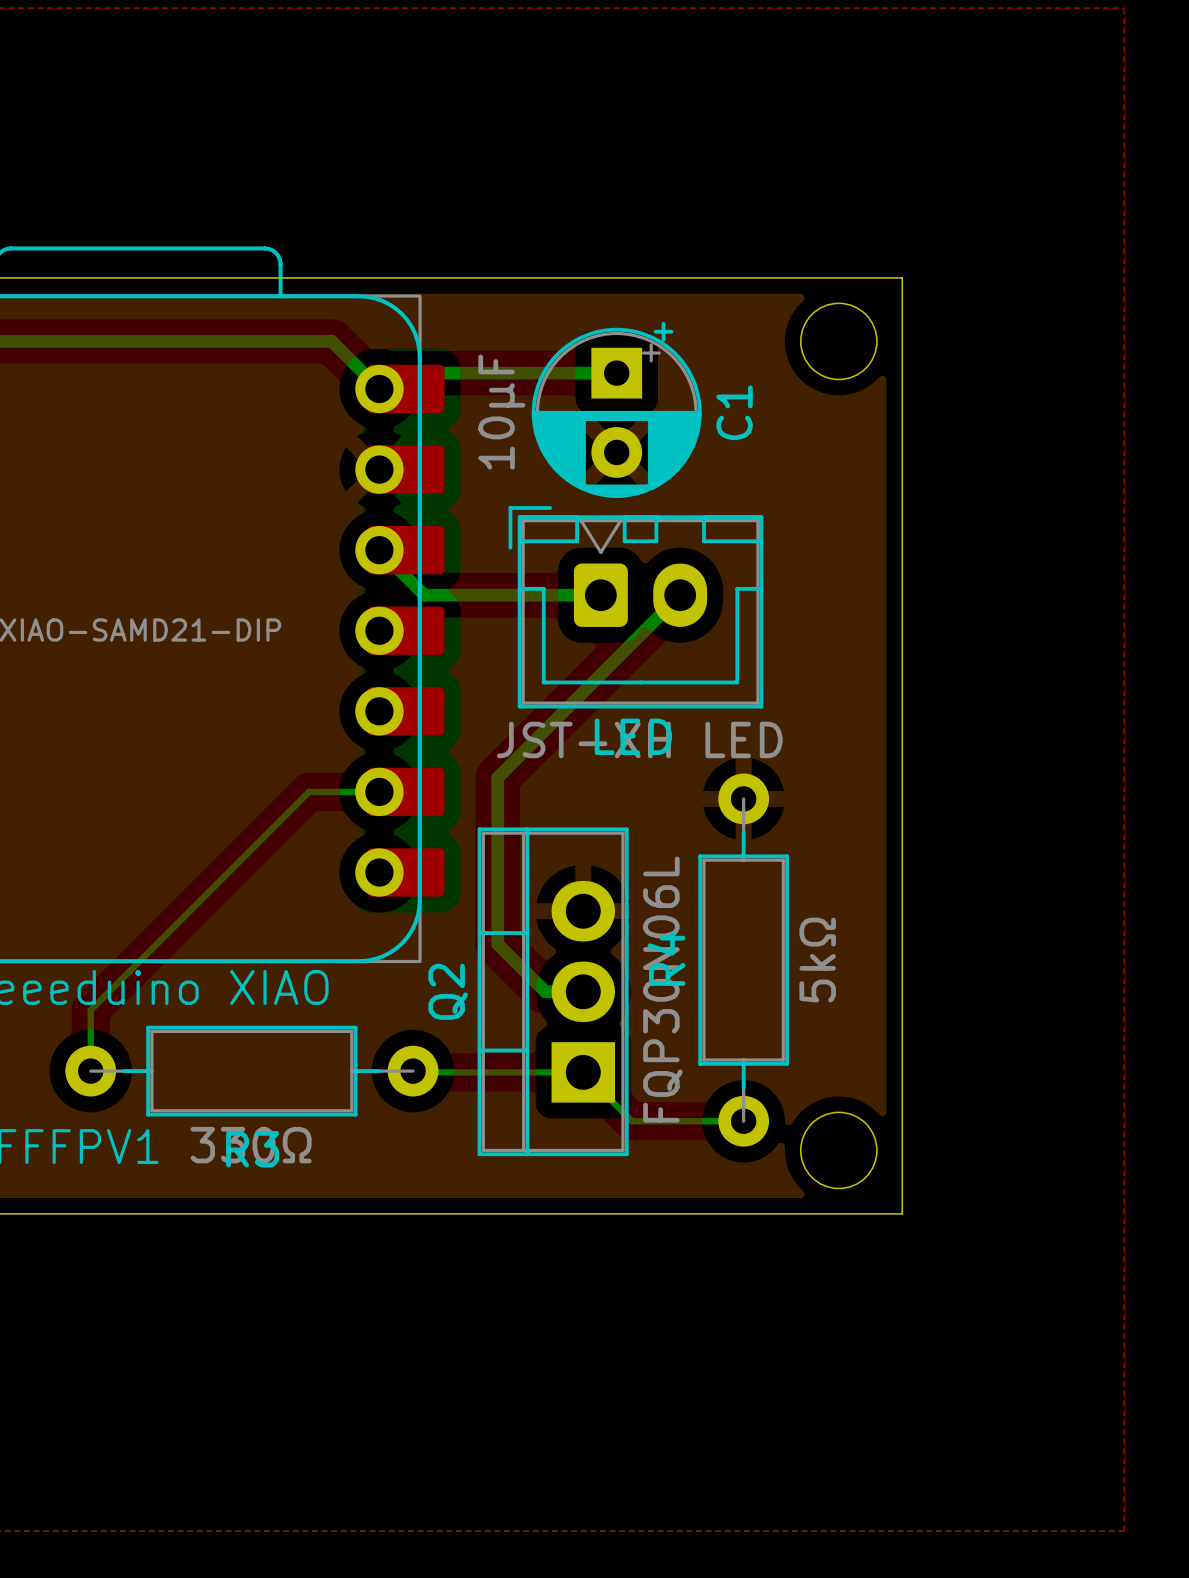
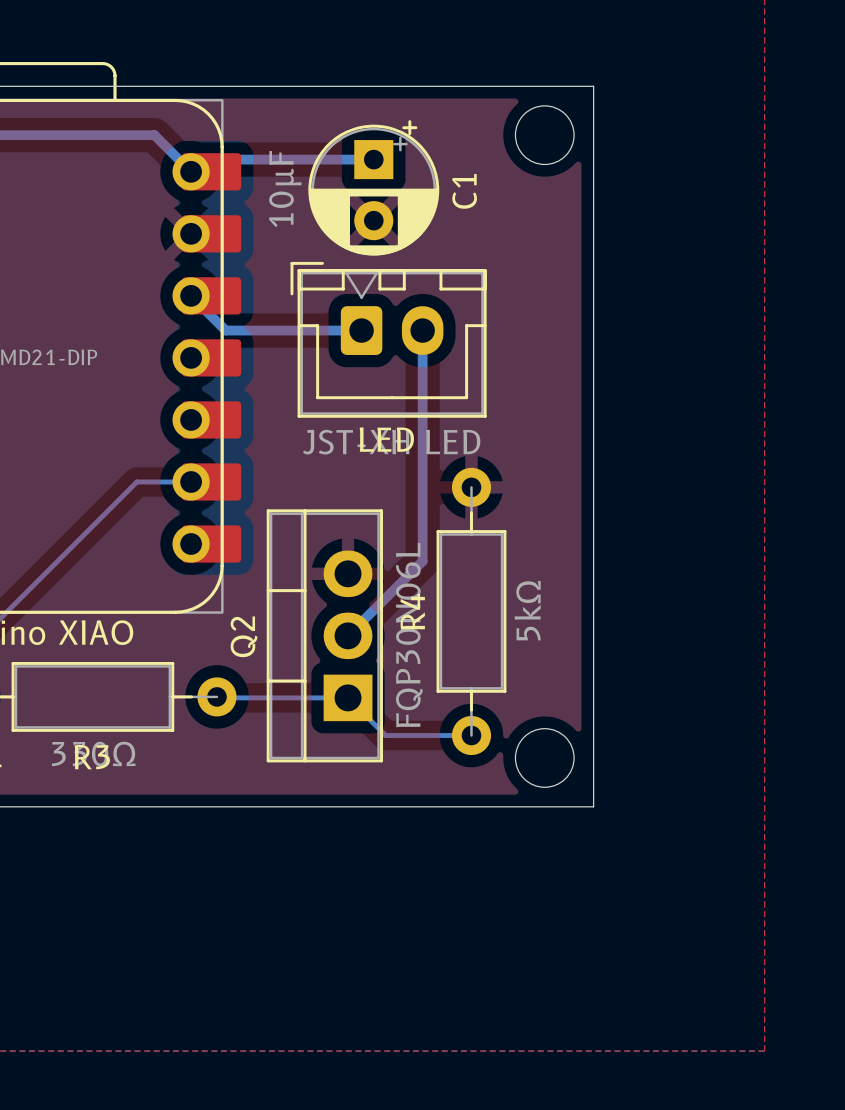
bottom track: (680, 595) (497, 777) (497, 944) (545, 991) (583, 991) -> (422, 330) (422, 561) (348, 635)

